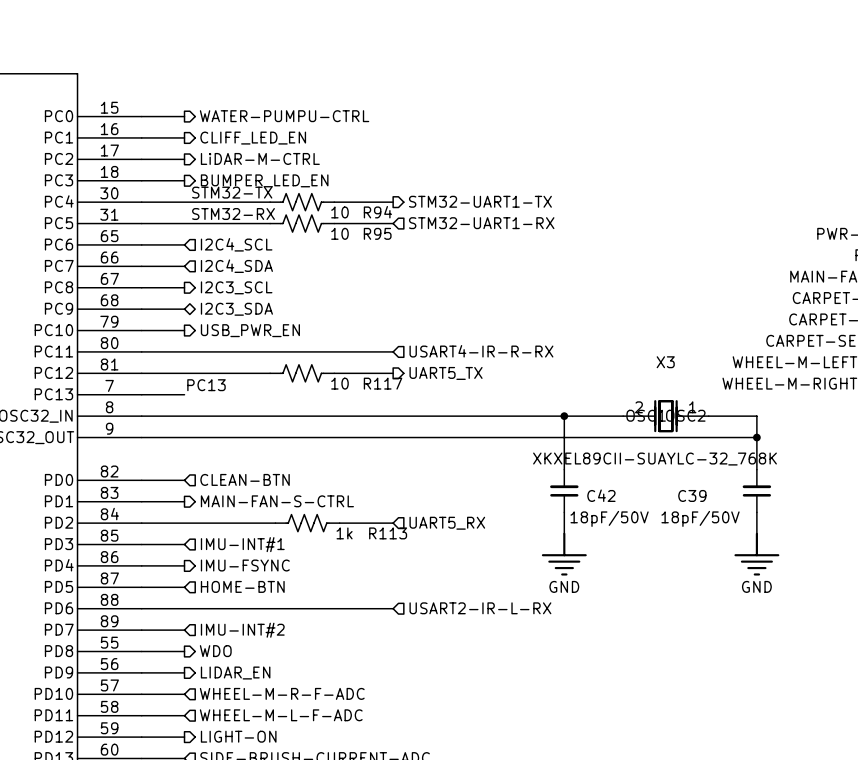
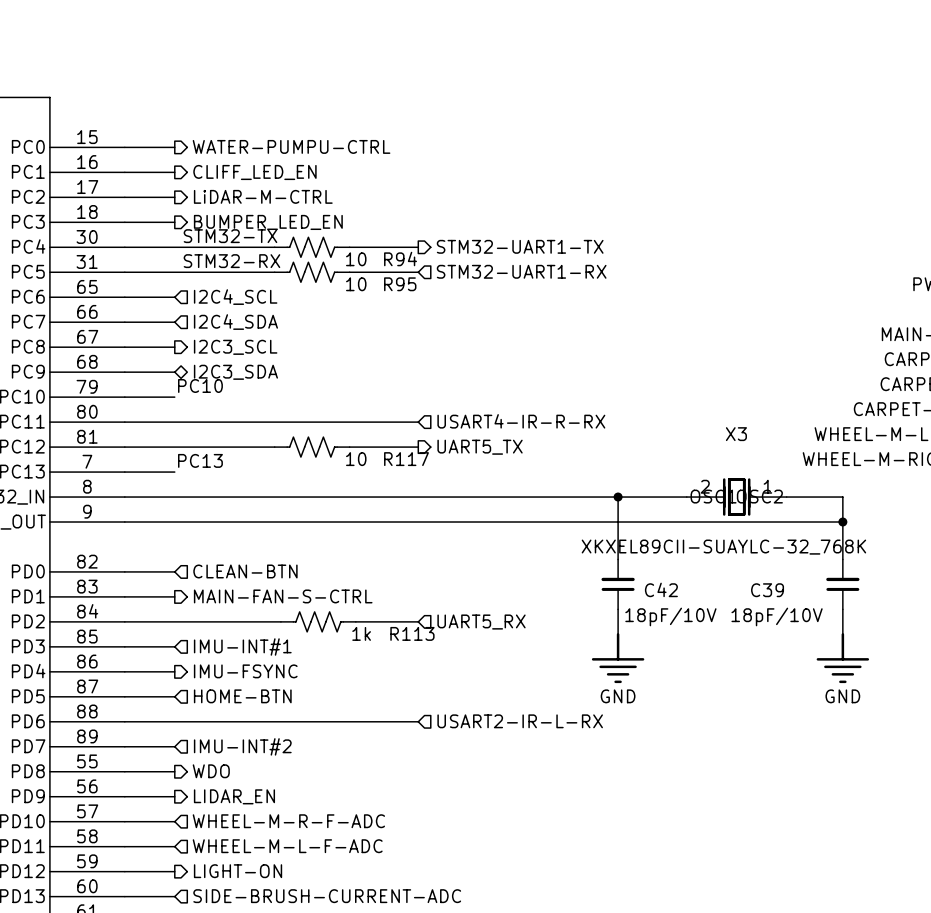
label: none -> PC10 (200, 385)
hierarchical label: USB_PWR_EN (250, 330) -> none
C42 value: 18pF/50V (609, 518) -> 18pF/10V (670, 616)
C39 value: 18pF/50V (700, 518) -> 18pF/10V (777, 616)

